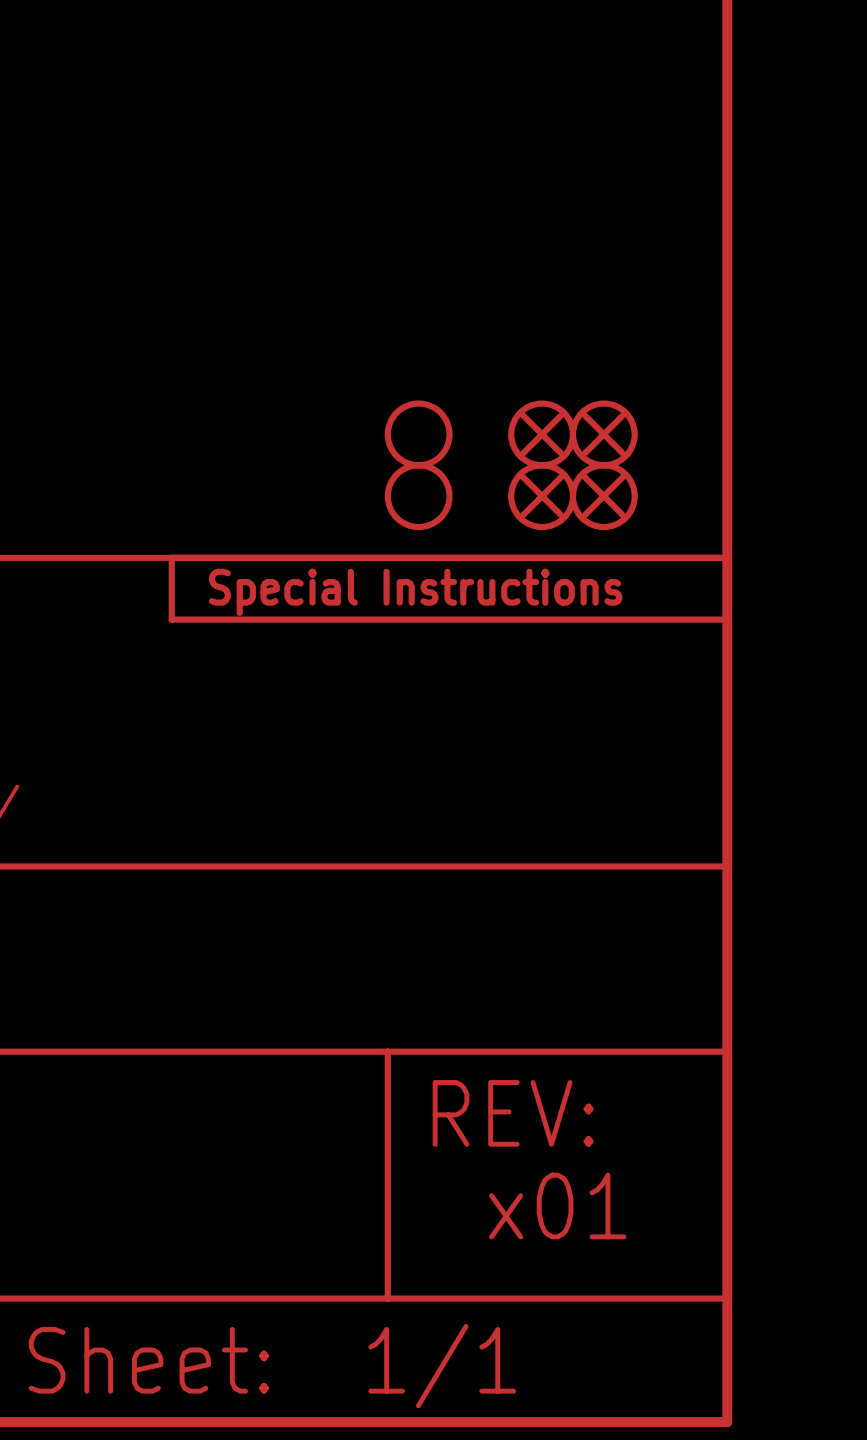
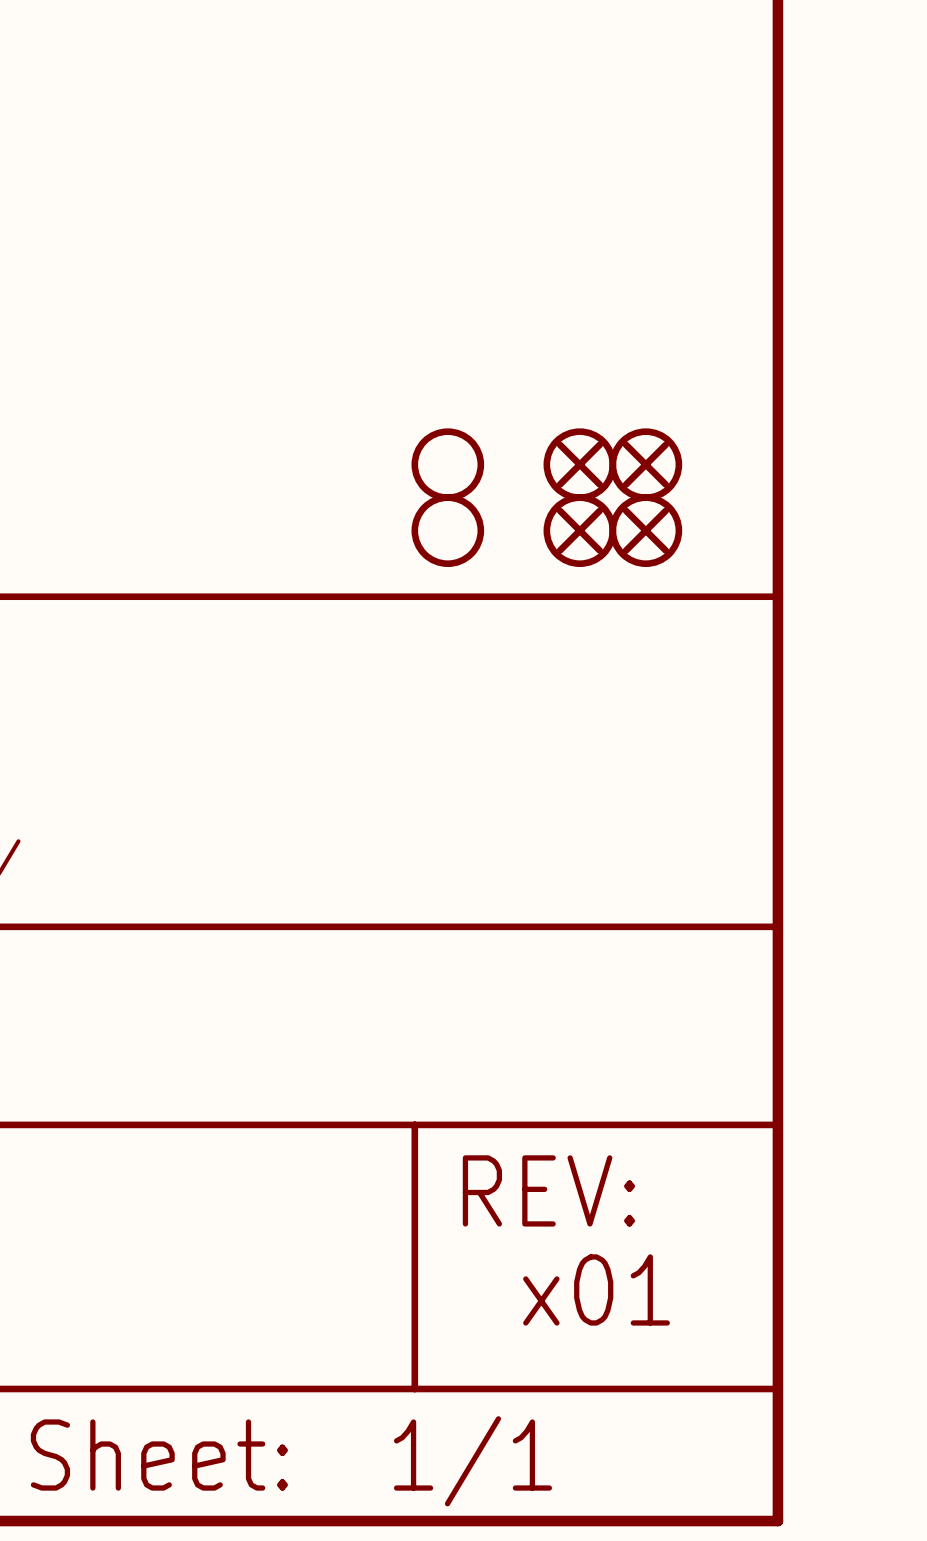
part: (449, 588) -> none

